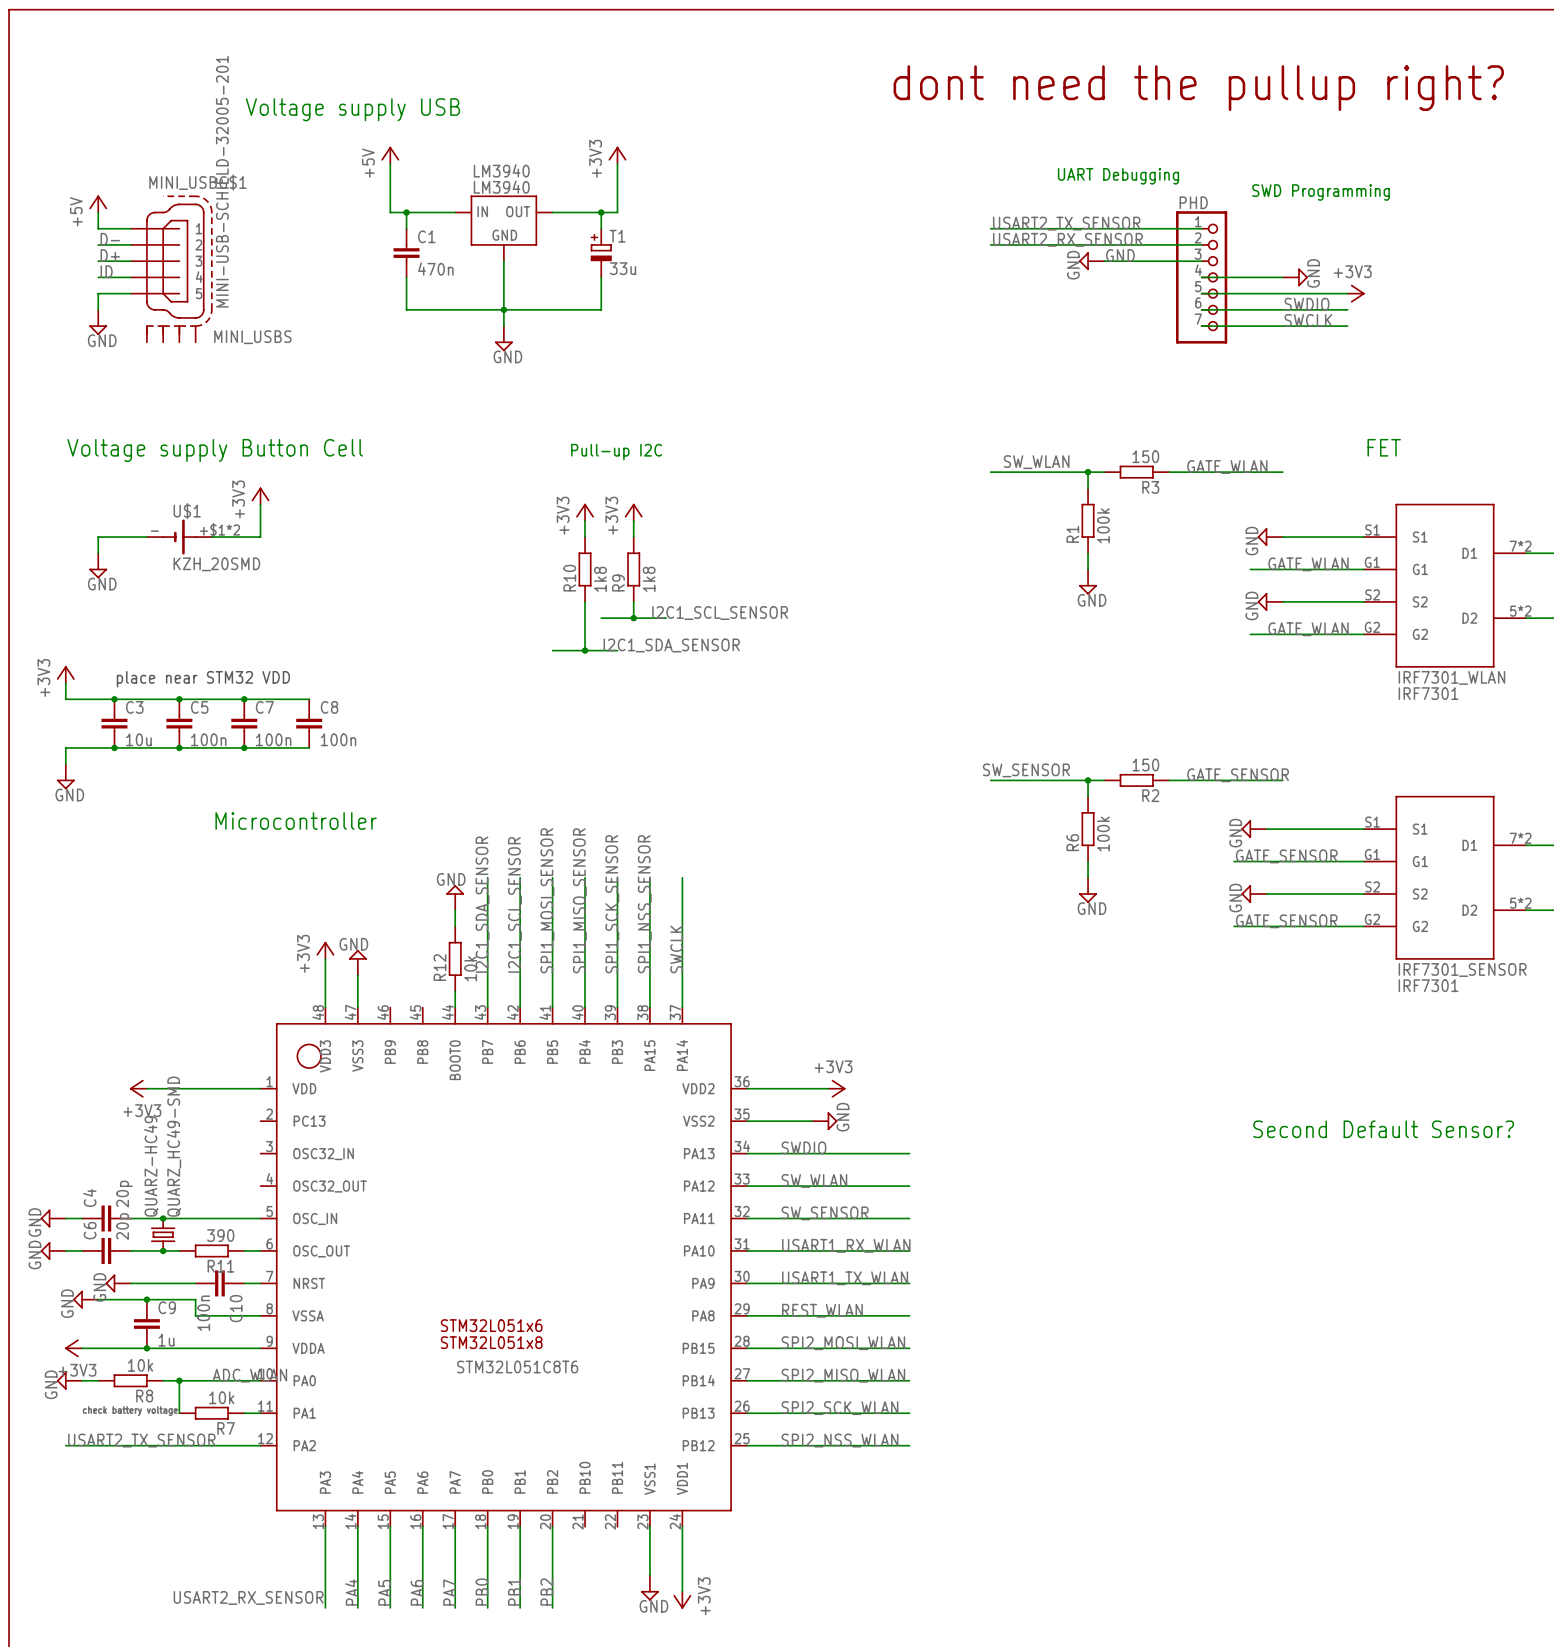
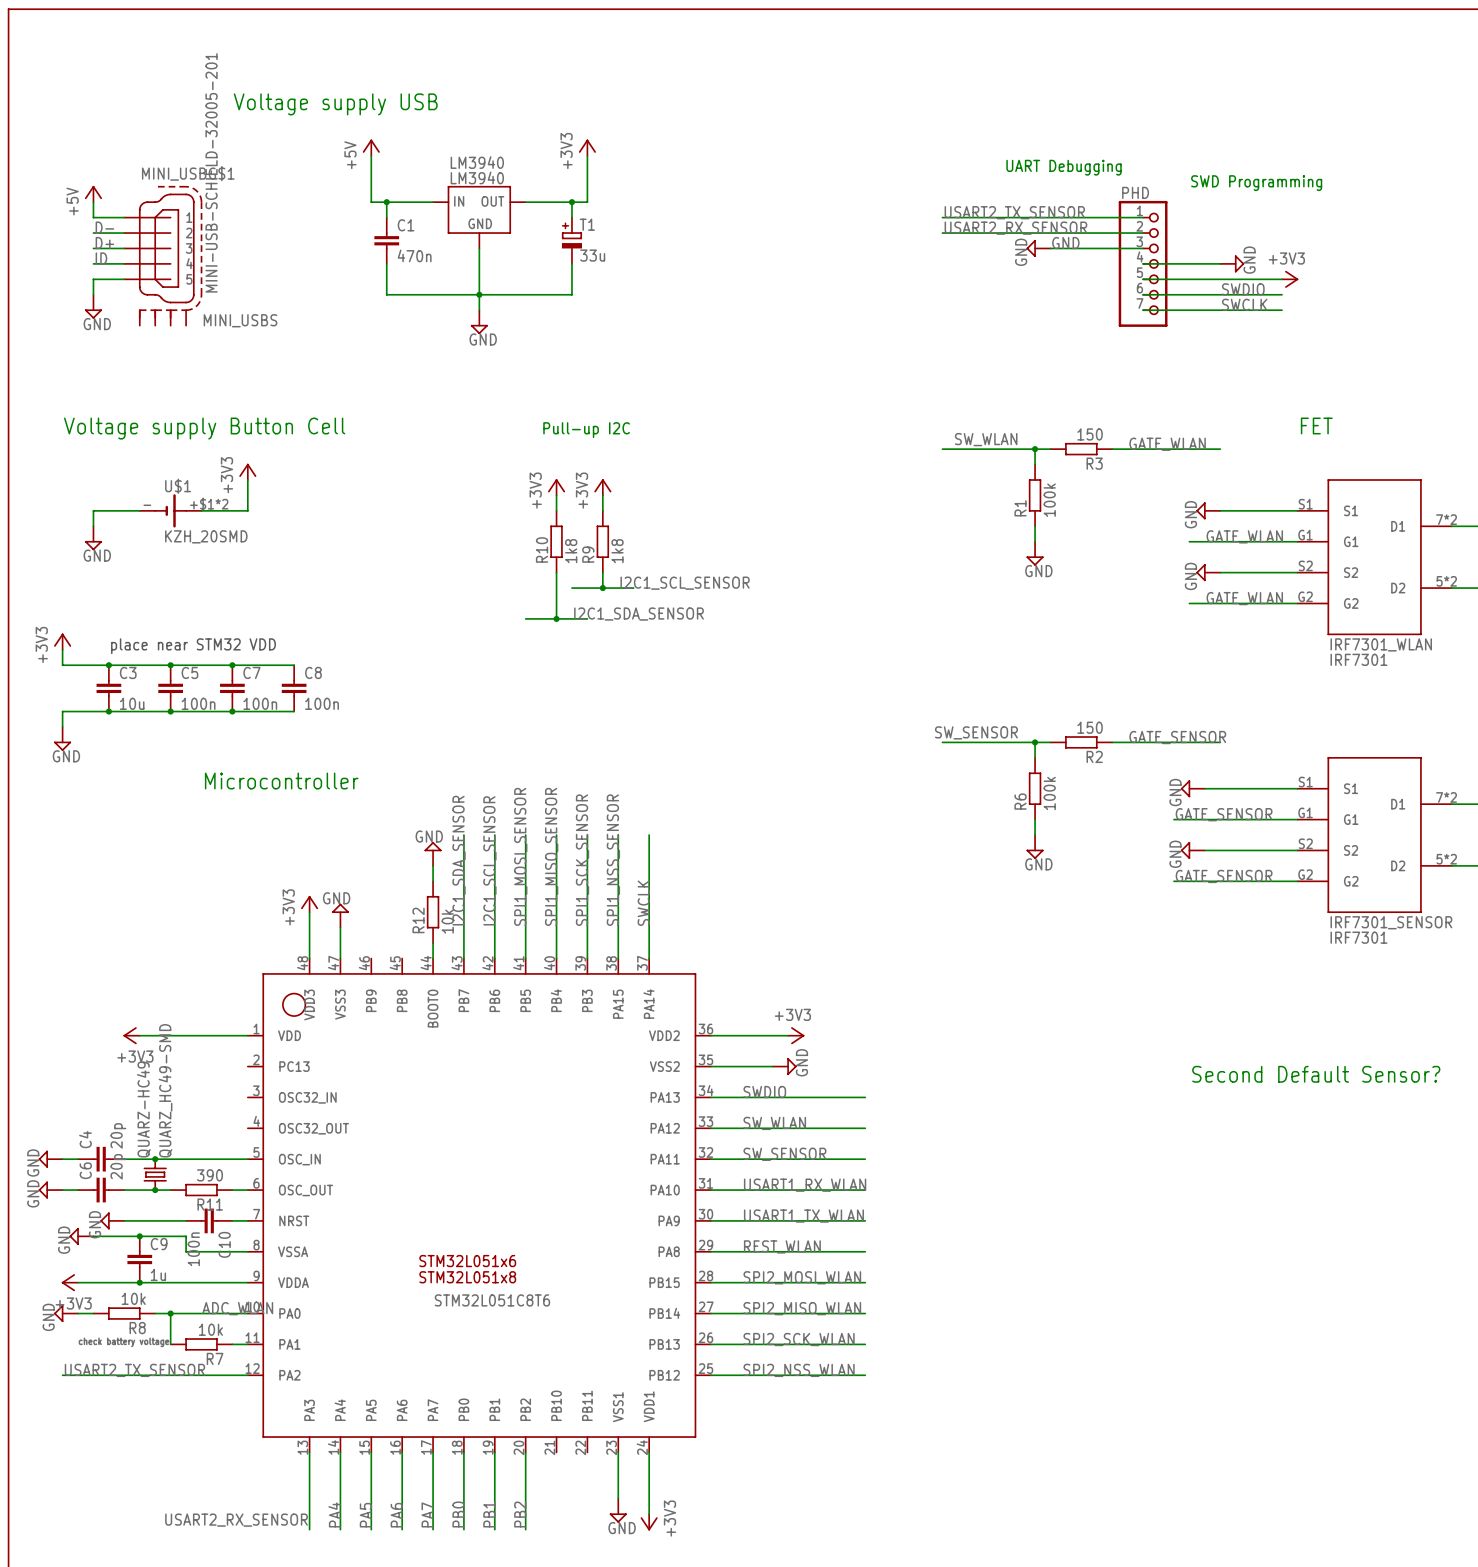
text: dont need the pullup right? (1198, 88) -> none

